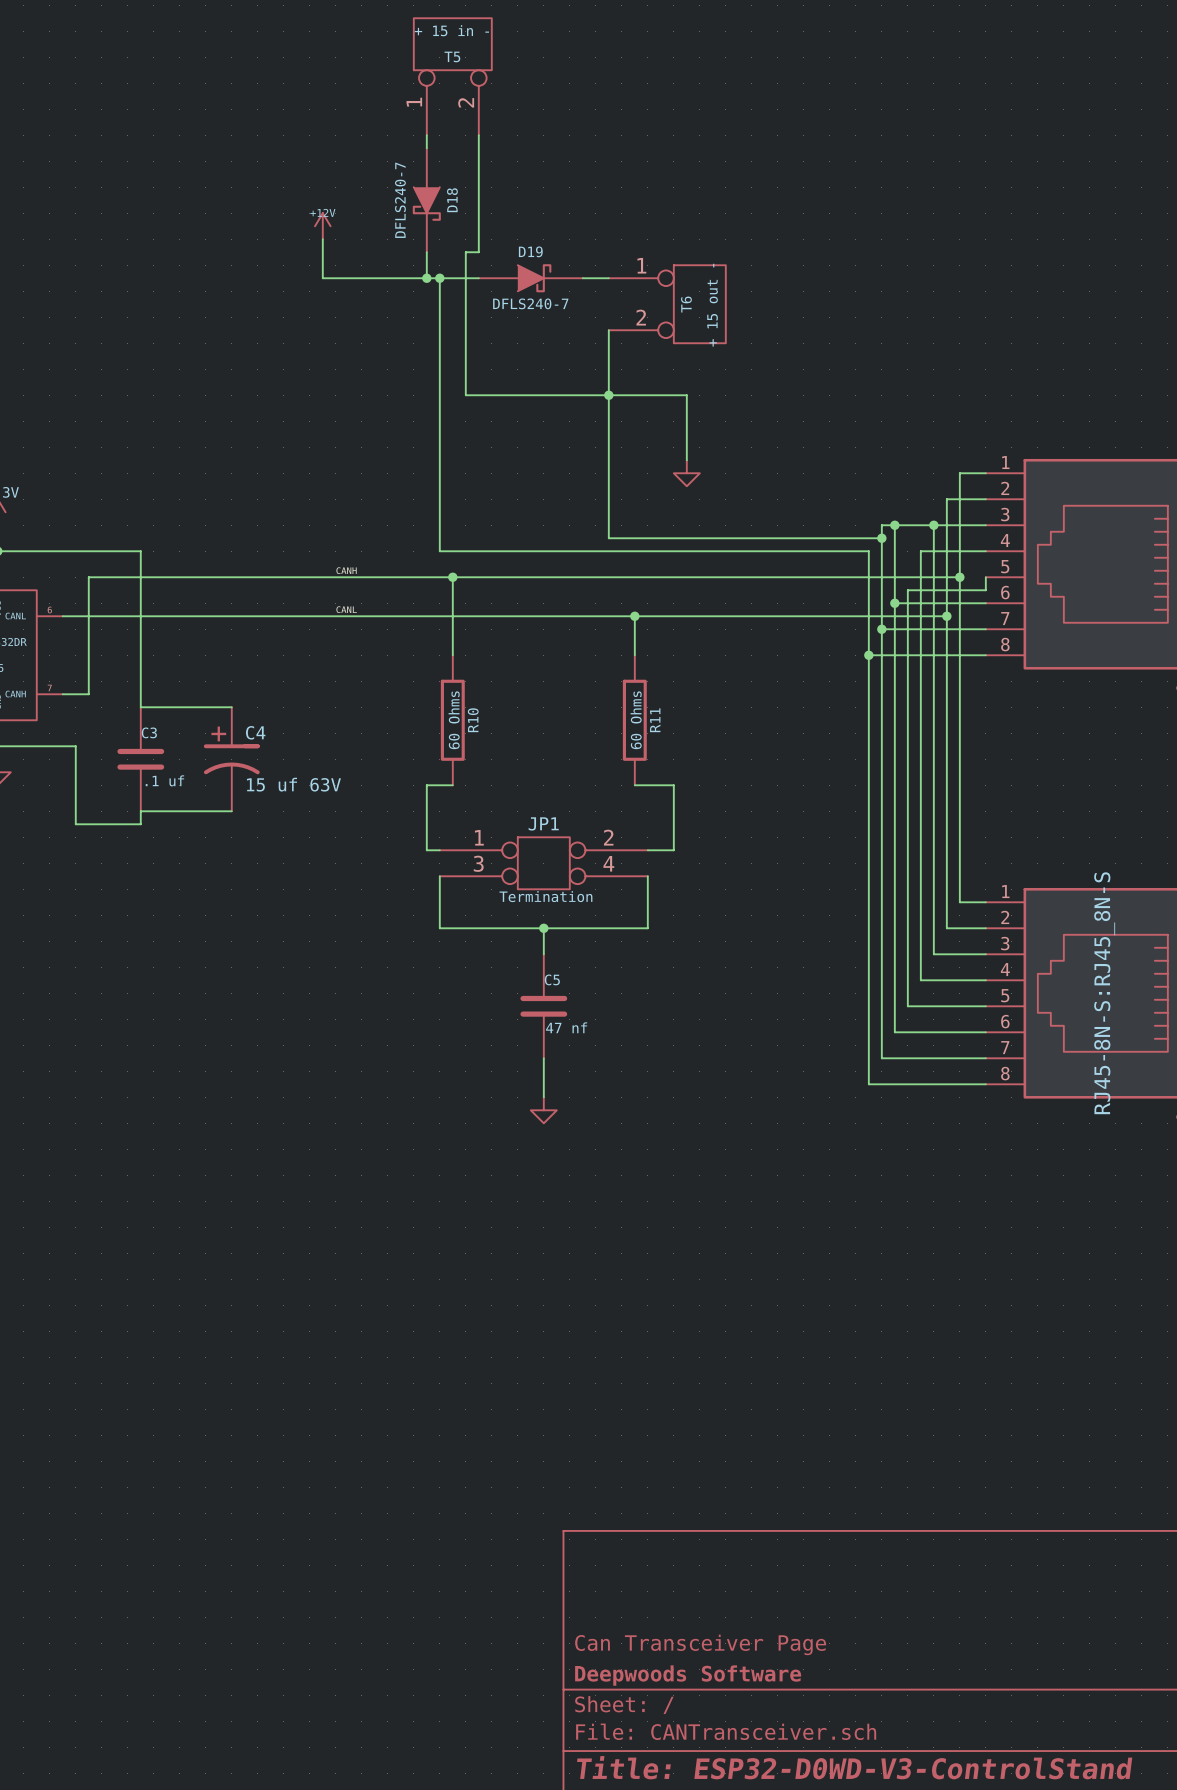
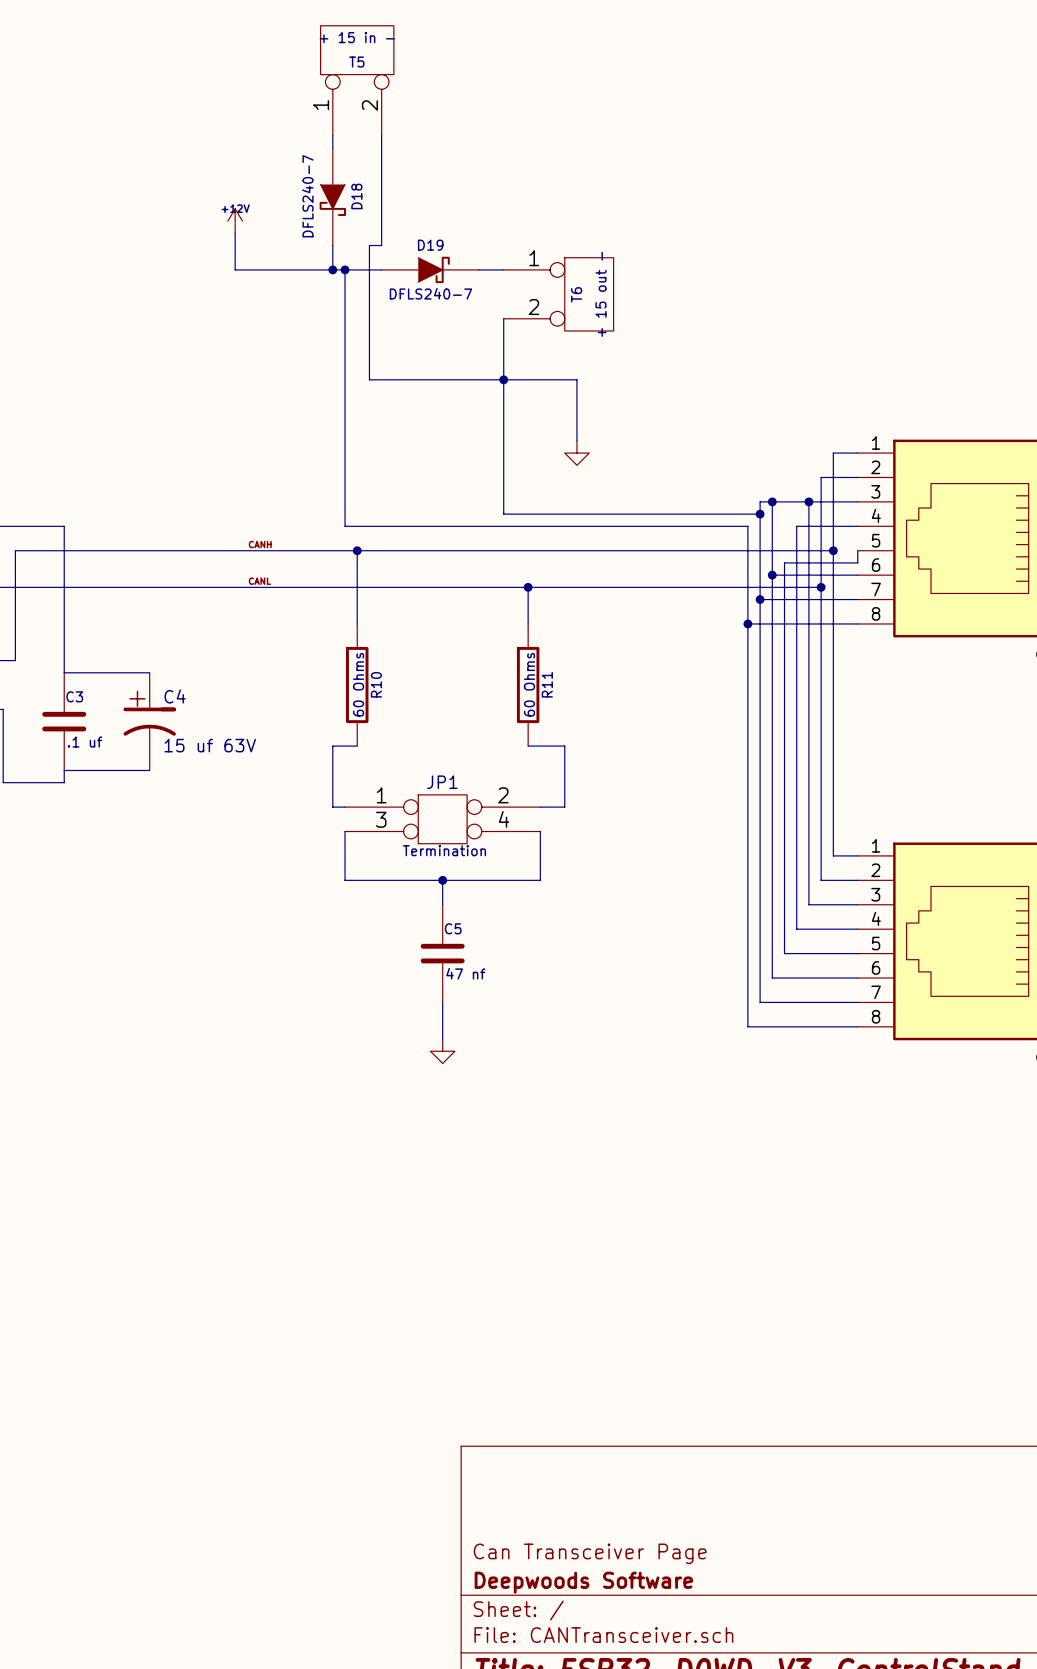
part text: RJ45-8N-S:RJ45_8N-S (1104, 993) -> none

